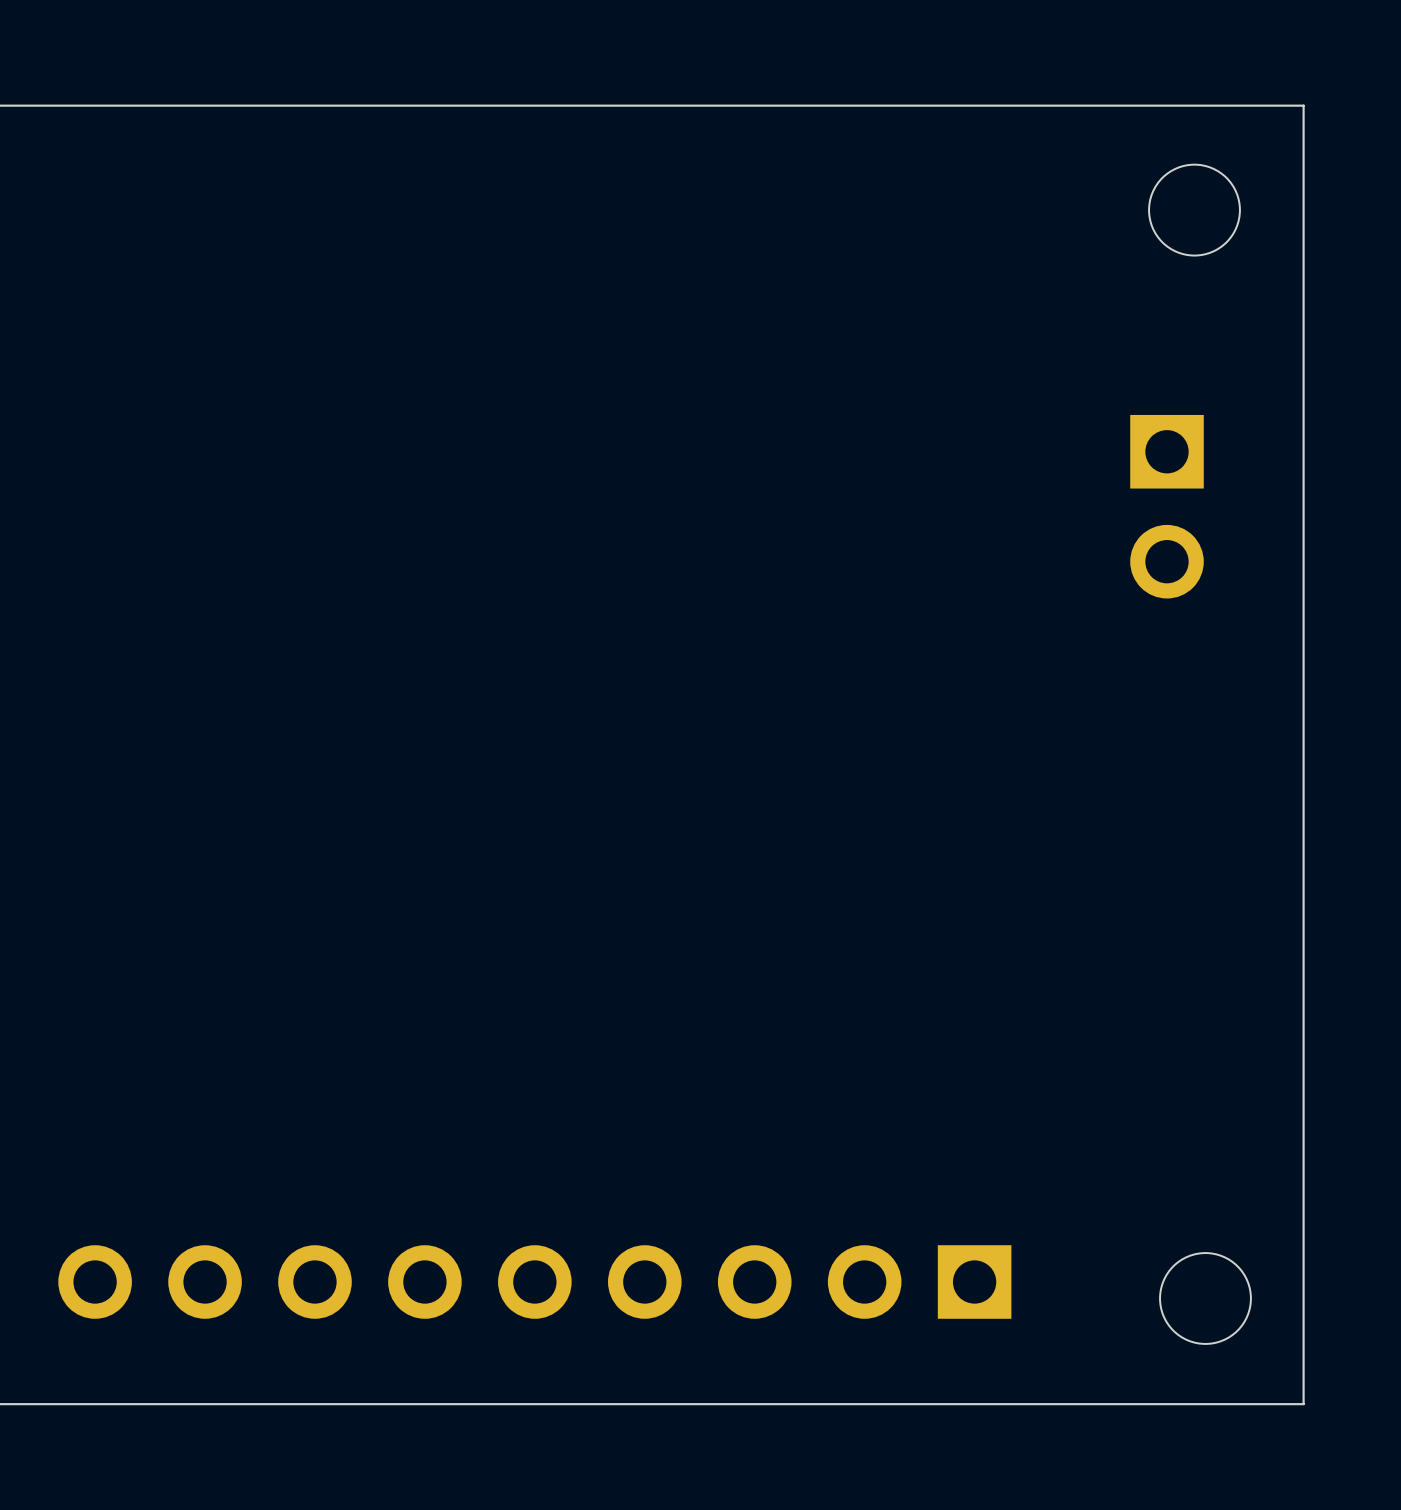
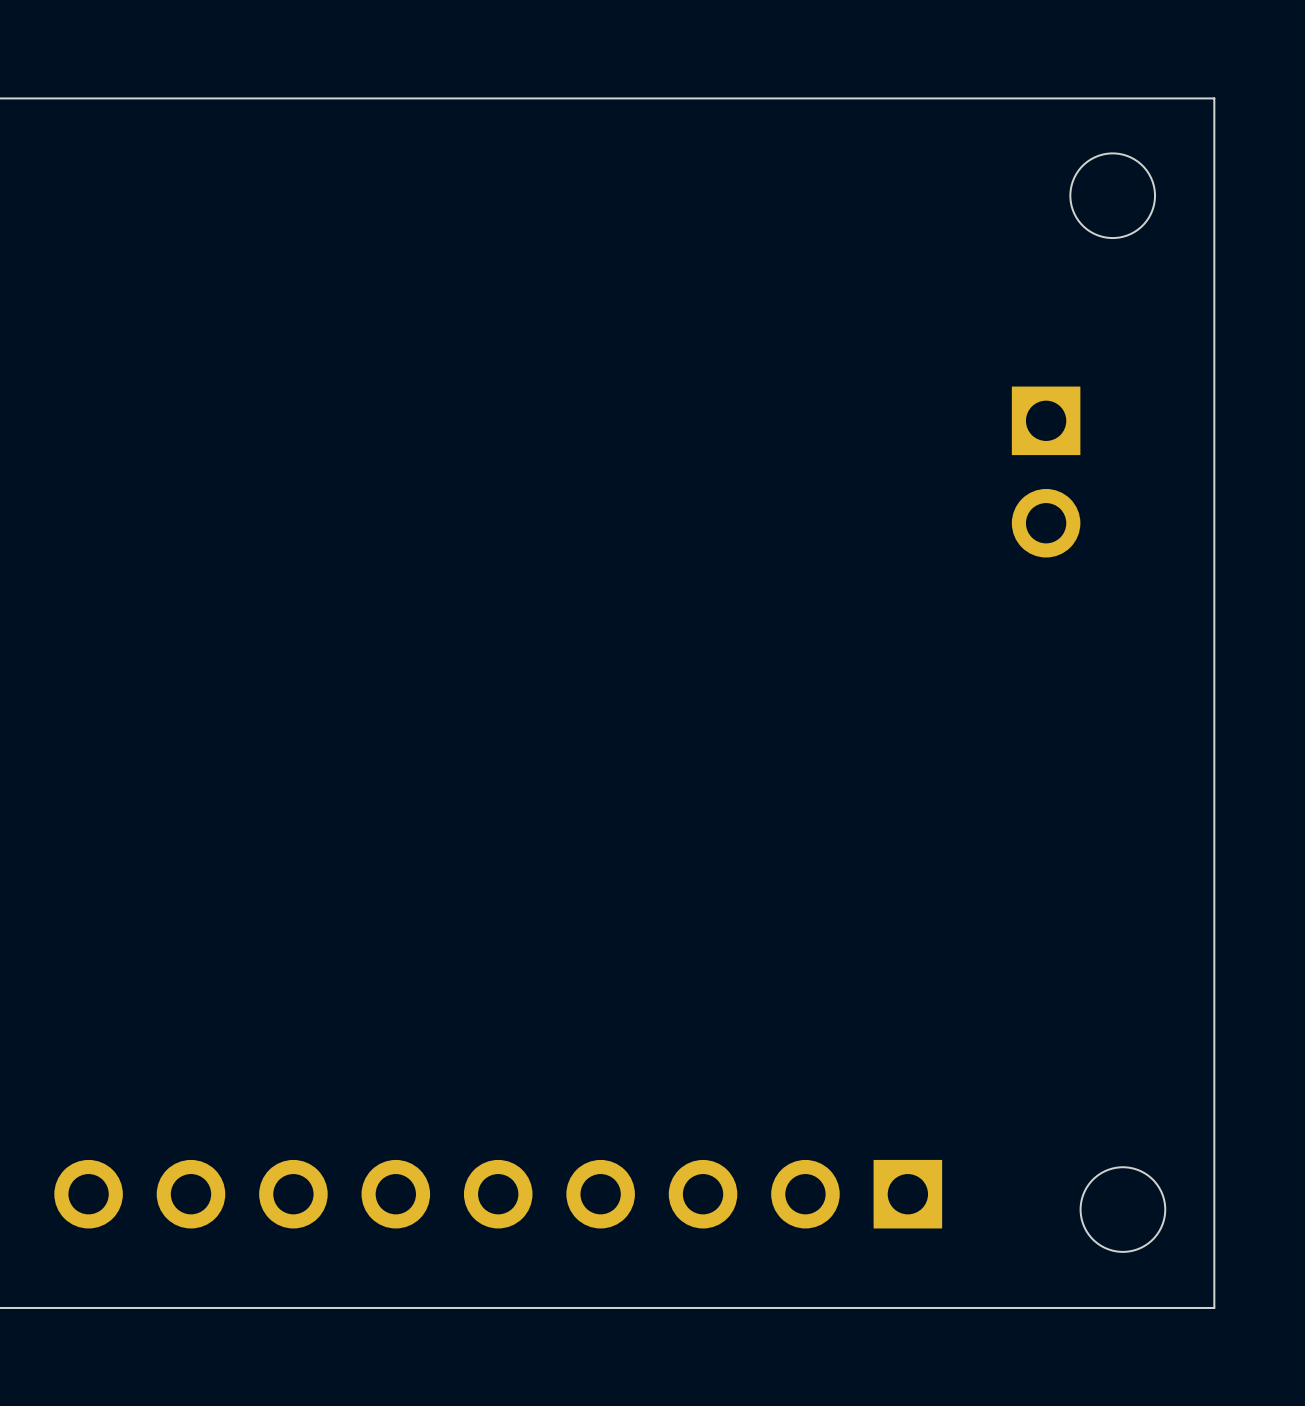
part position: (1167, 506) -> (1046, 472)

